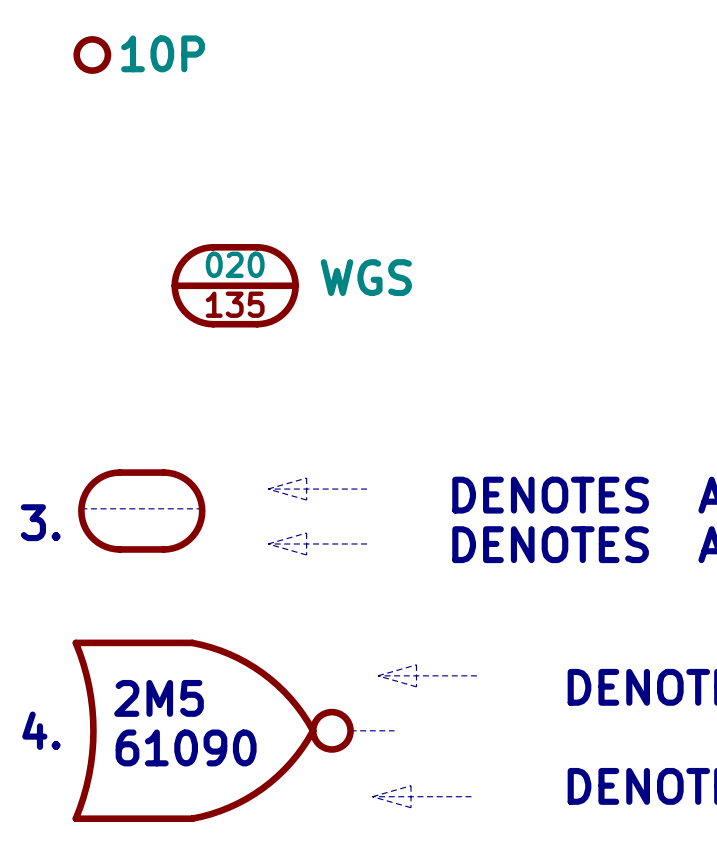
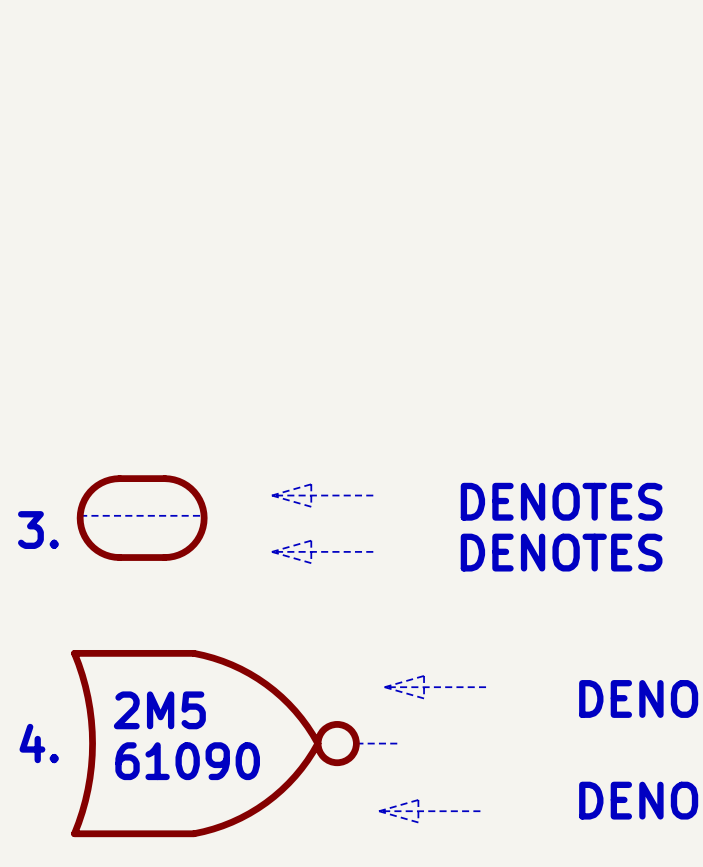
part: (92, 55) -> none
part: (235, 285) -> none

